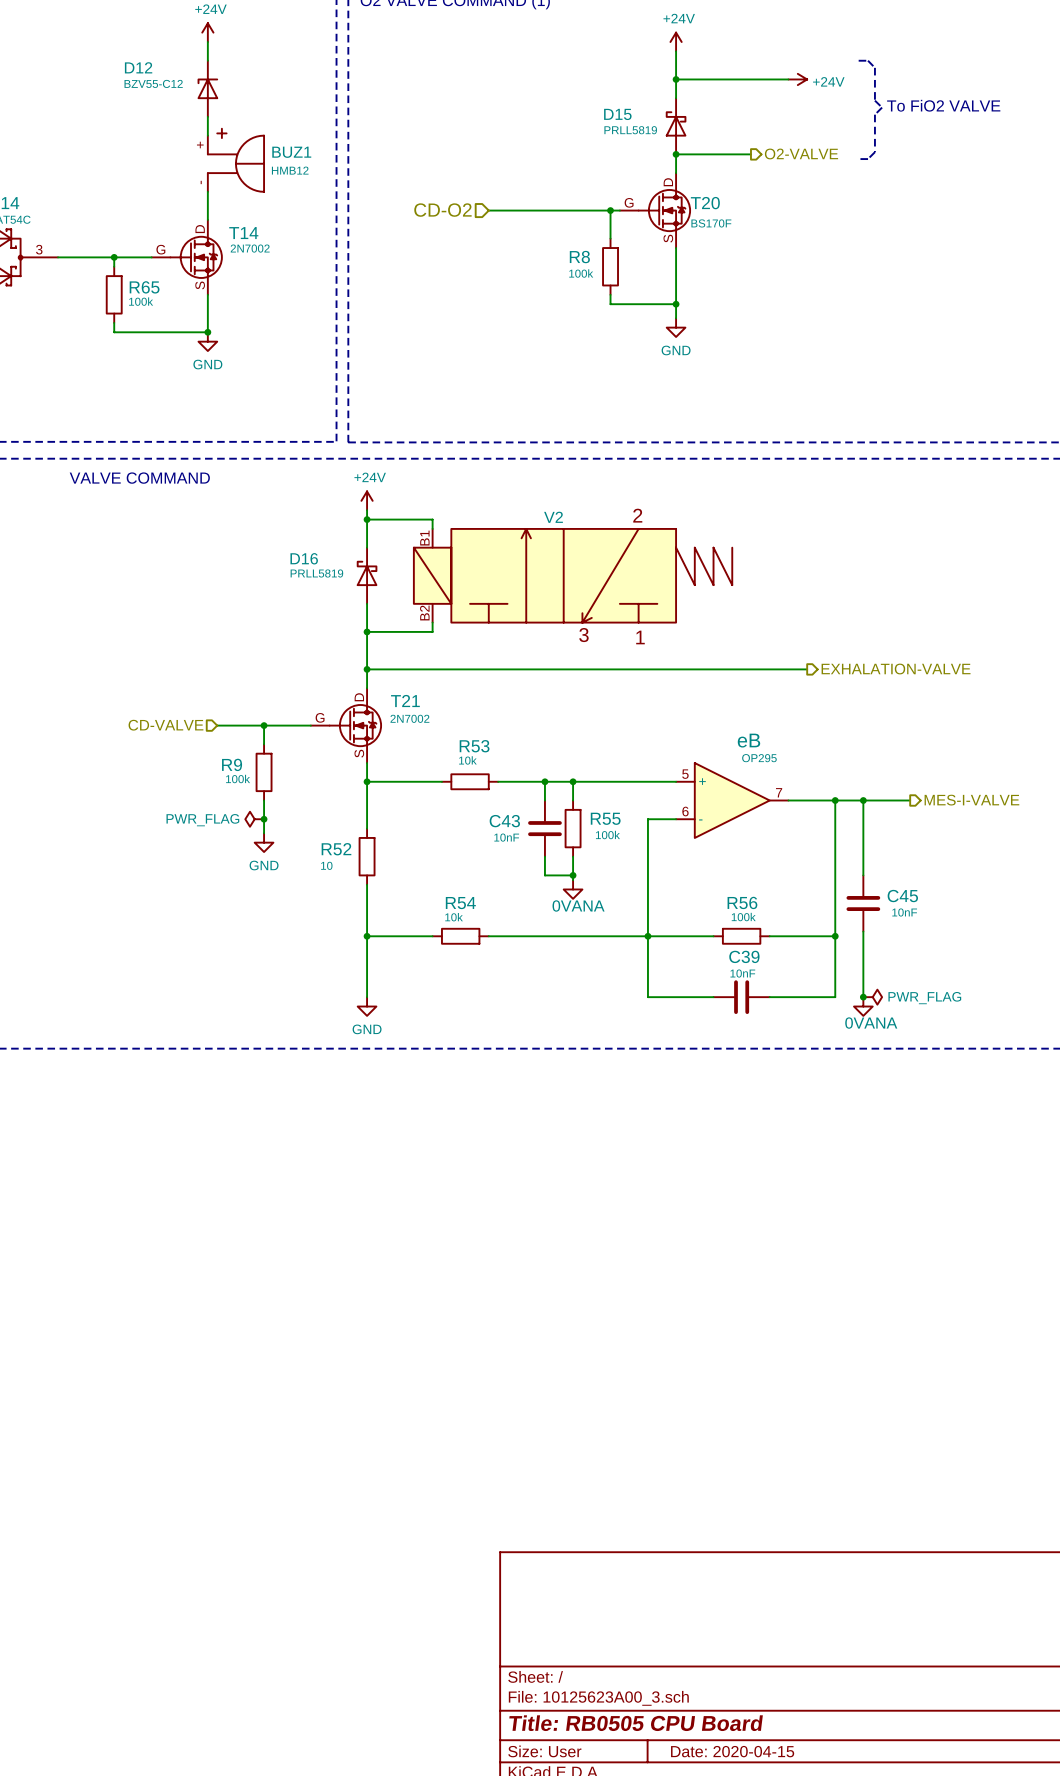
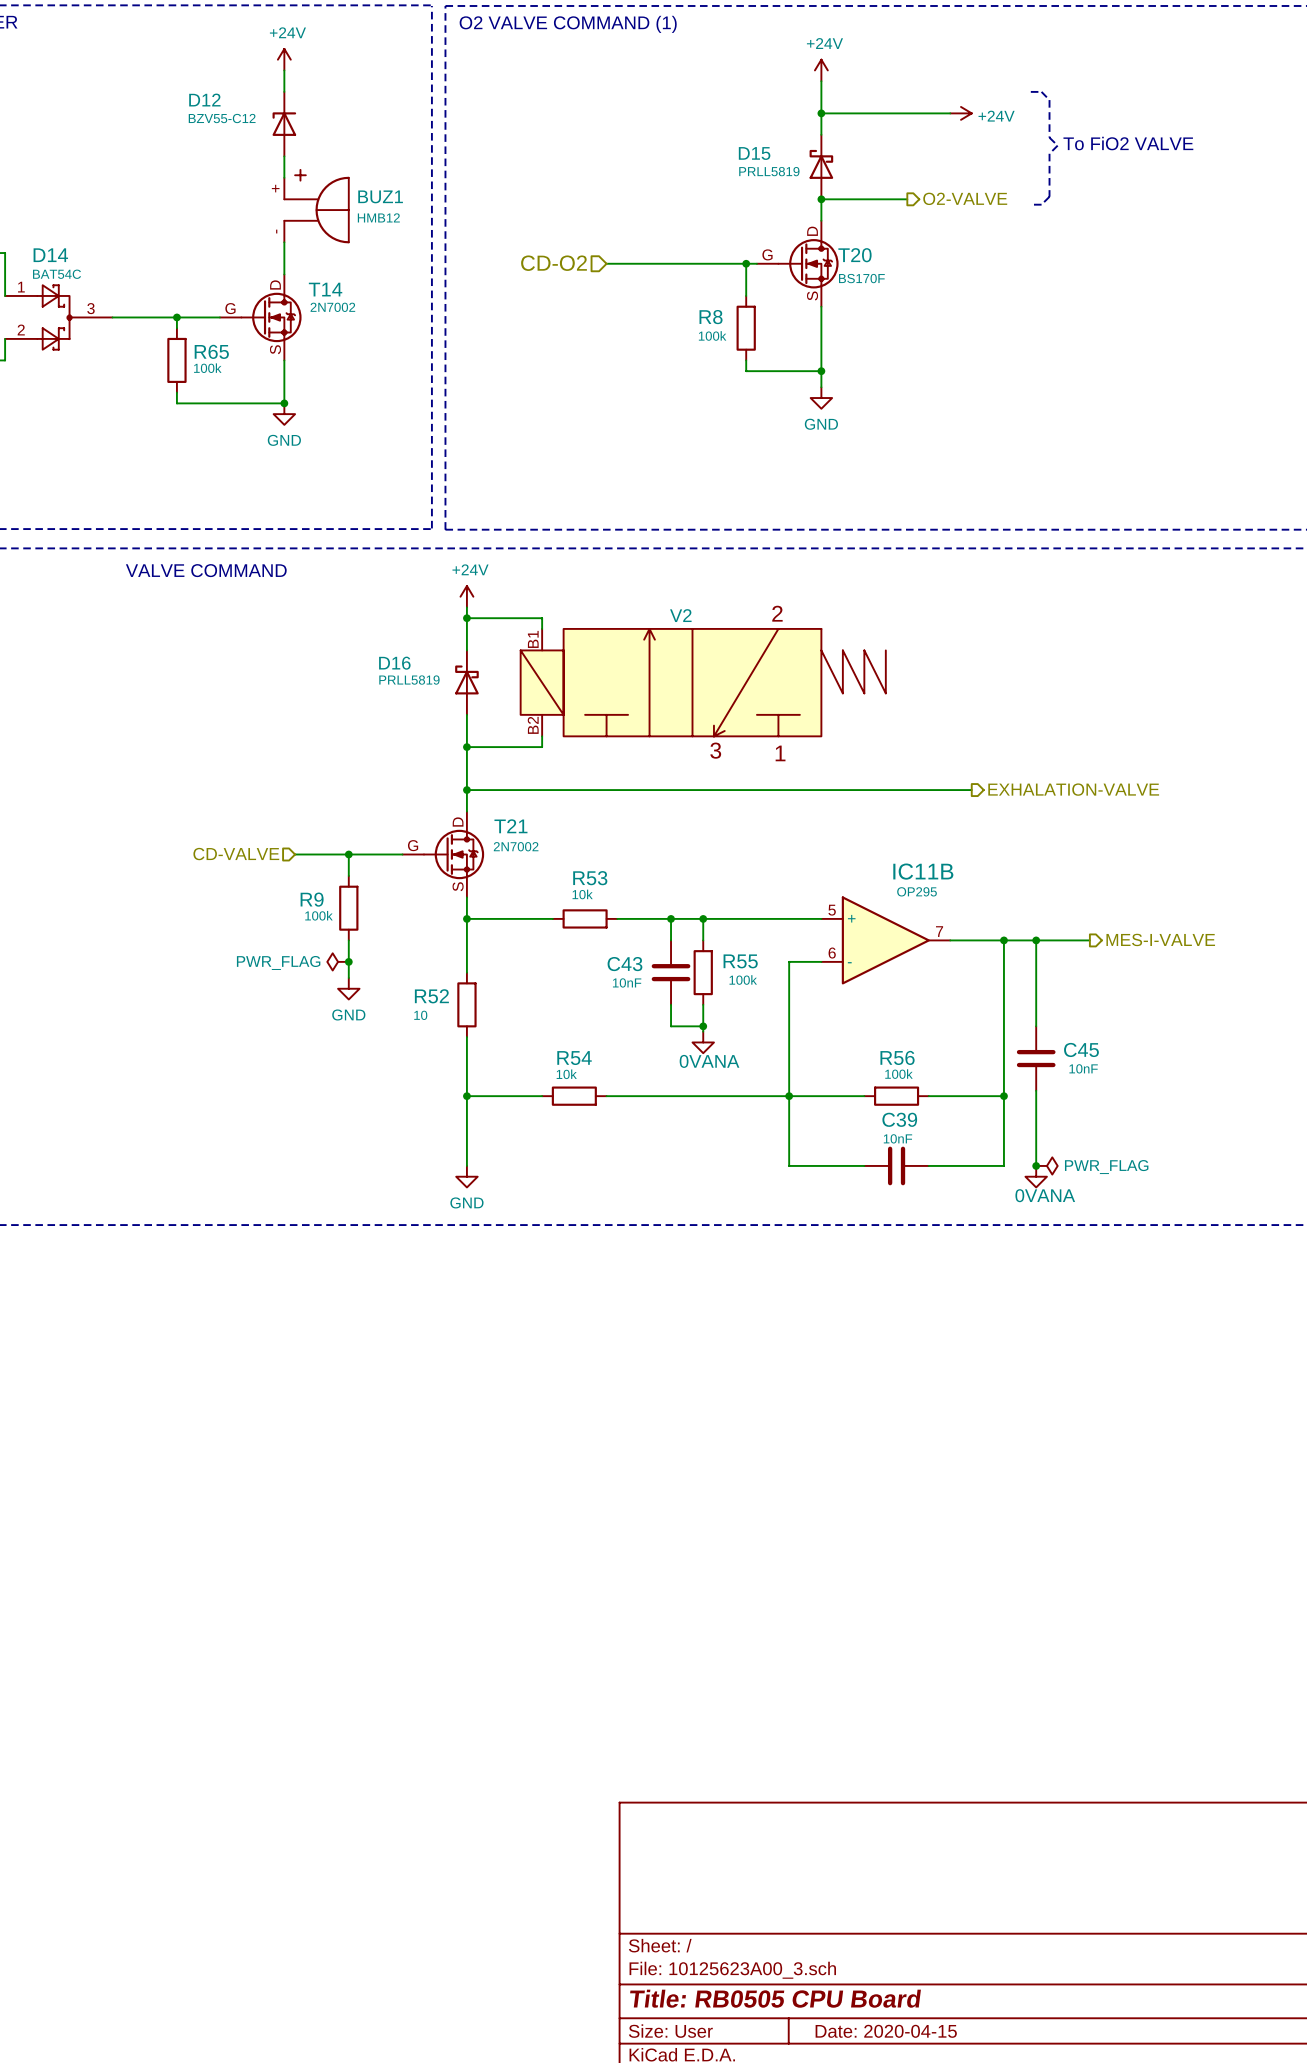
eB name: eB (748, 740) -> IC11B (923, 871)

